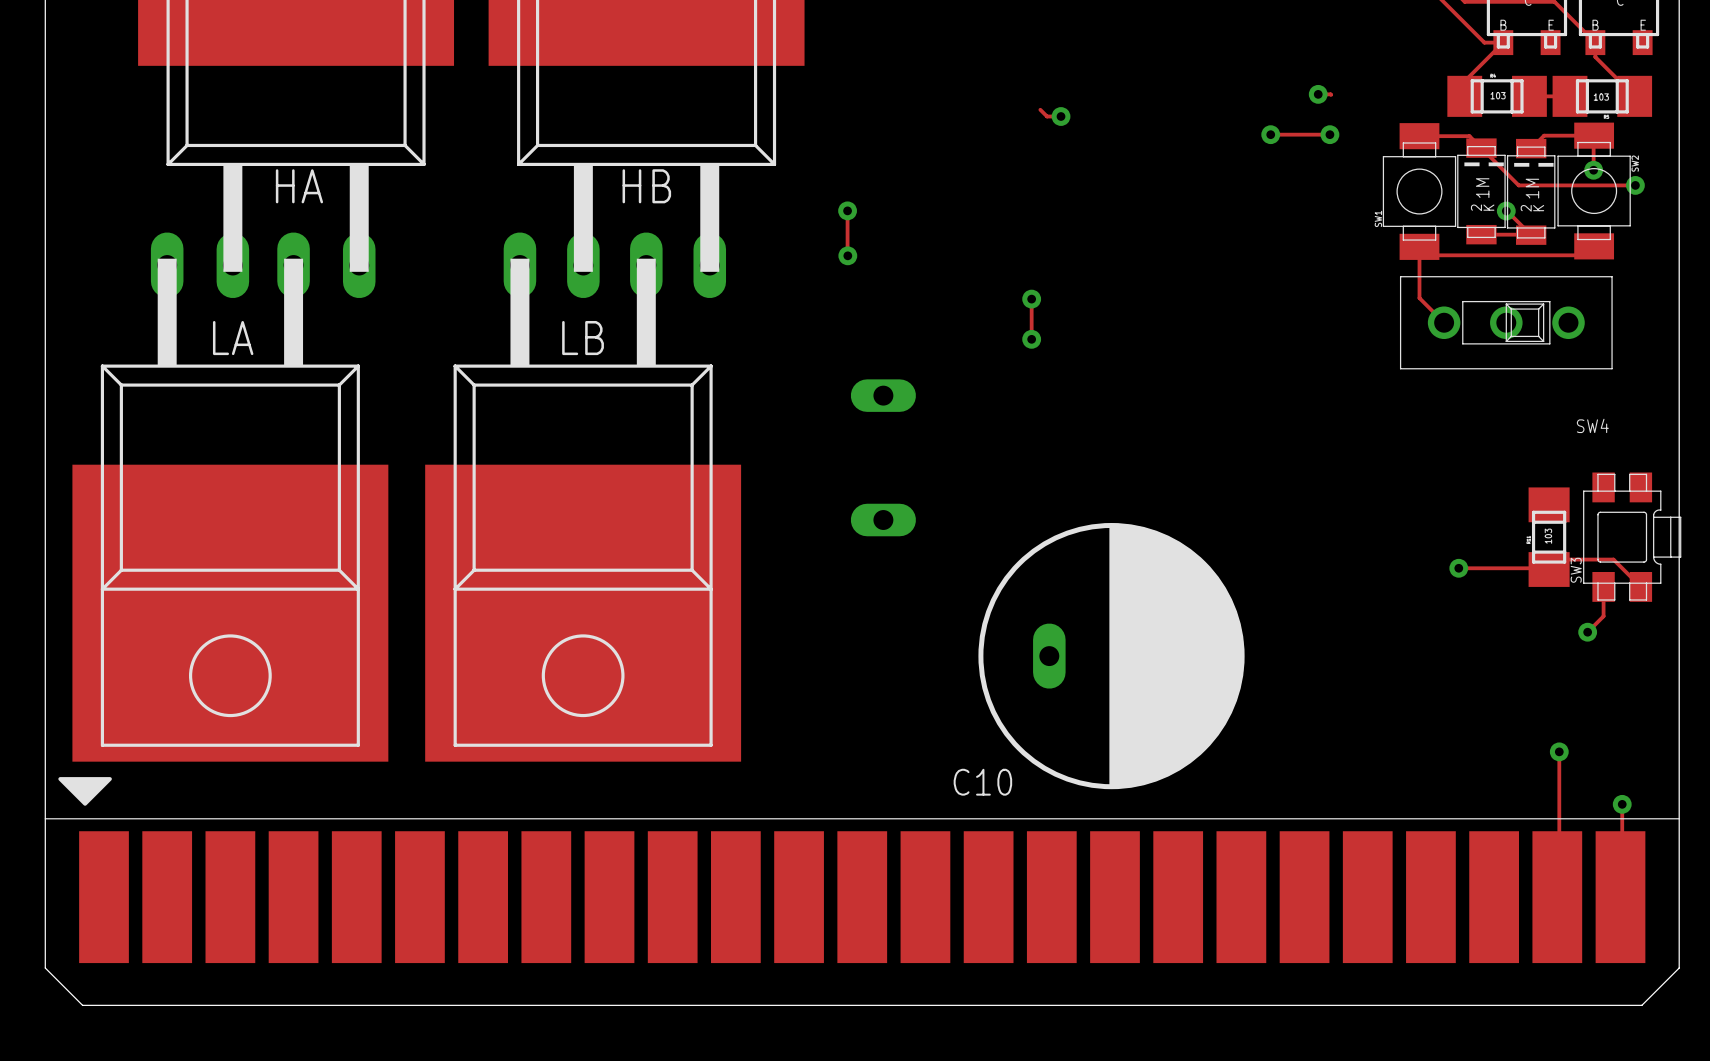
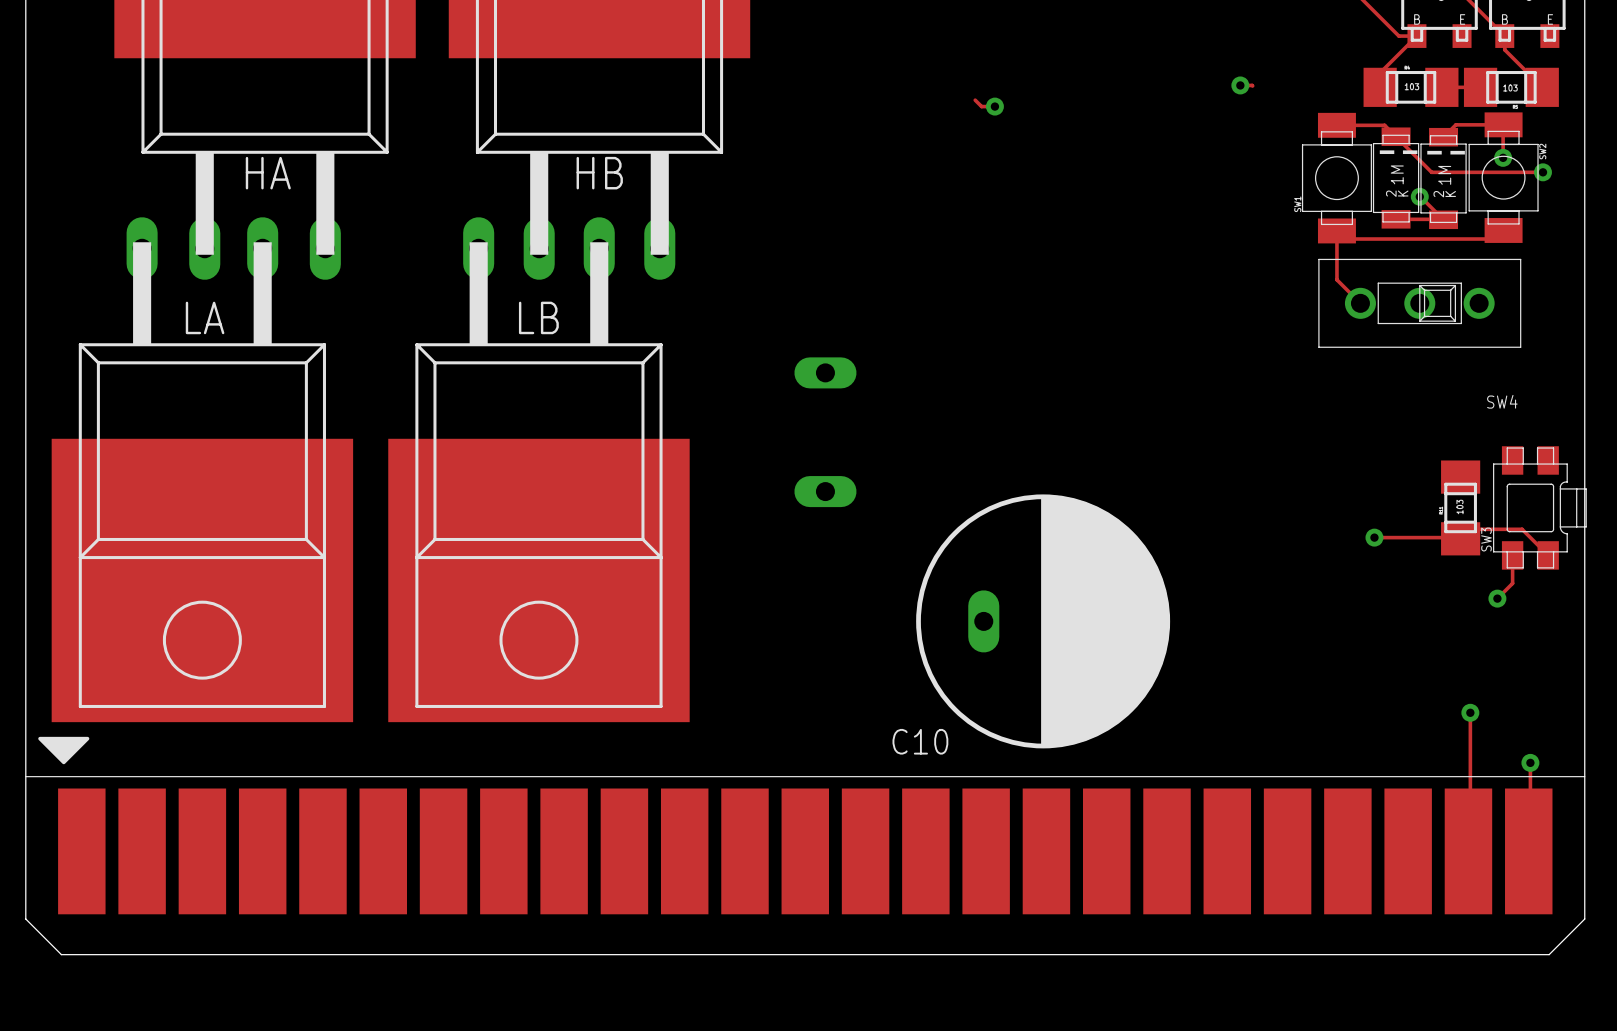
track: (1270, 134) (1329, 134) -> none
via: (1270, 134) -> none
via: (1329, 134) -> none
track: (847, 210) (847, 255) -> none
via: (847, 210) -> none
via: (847, 255) -> none
track: (1031, 299) (1031, 339) -> none
via: (1031, 299) -> none
via: (1031, 339) -> none

